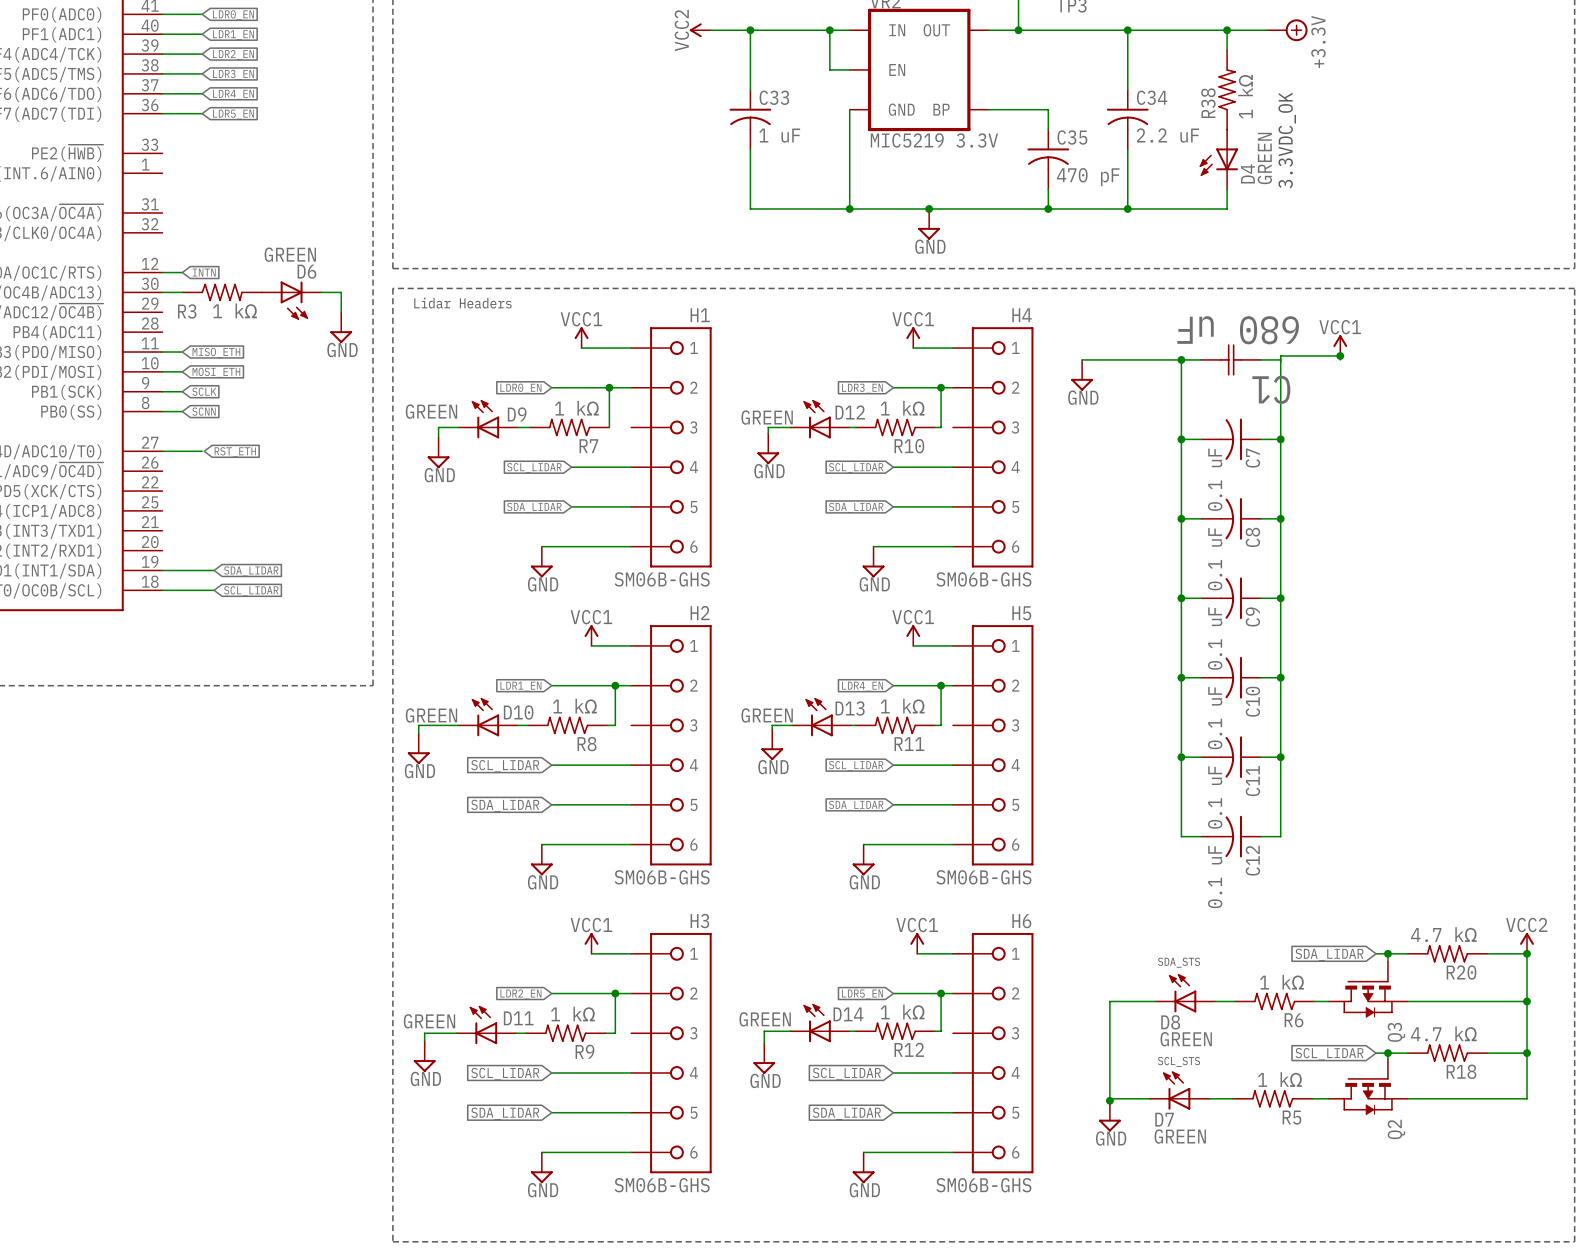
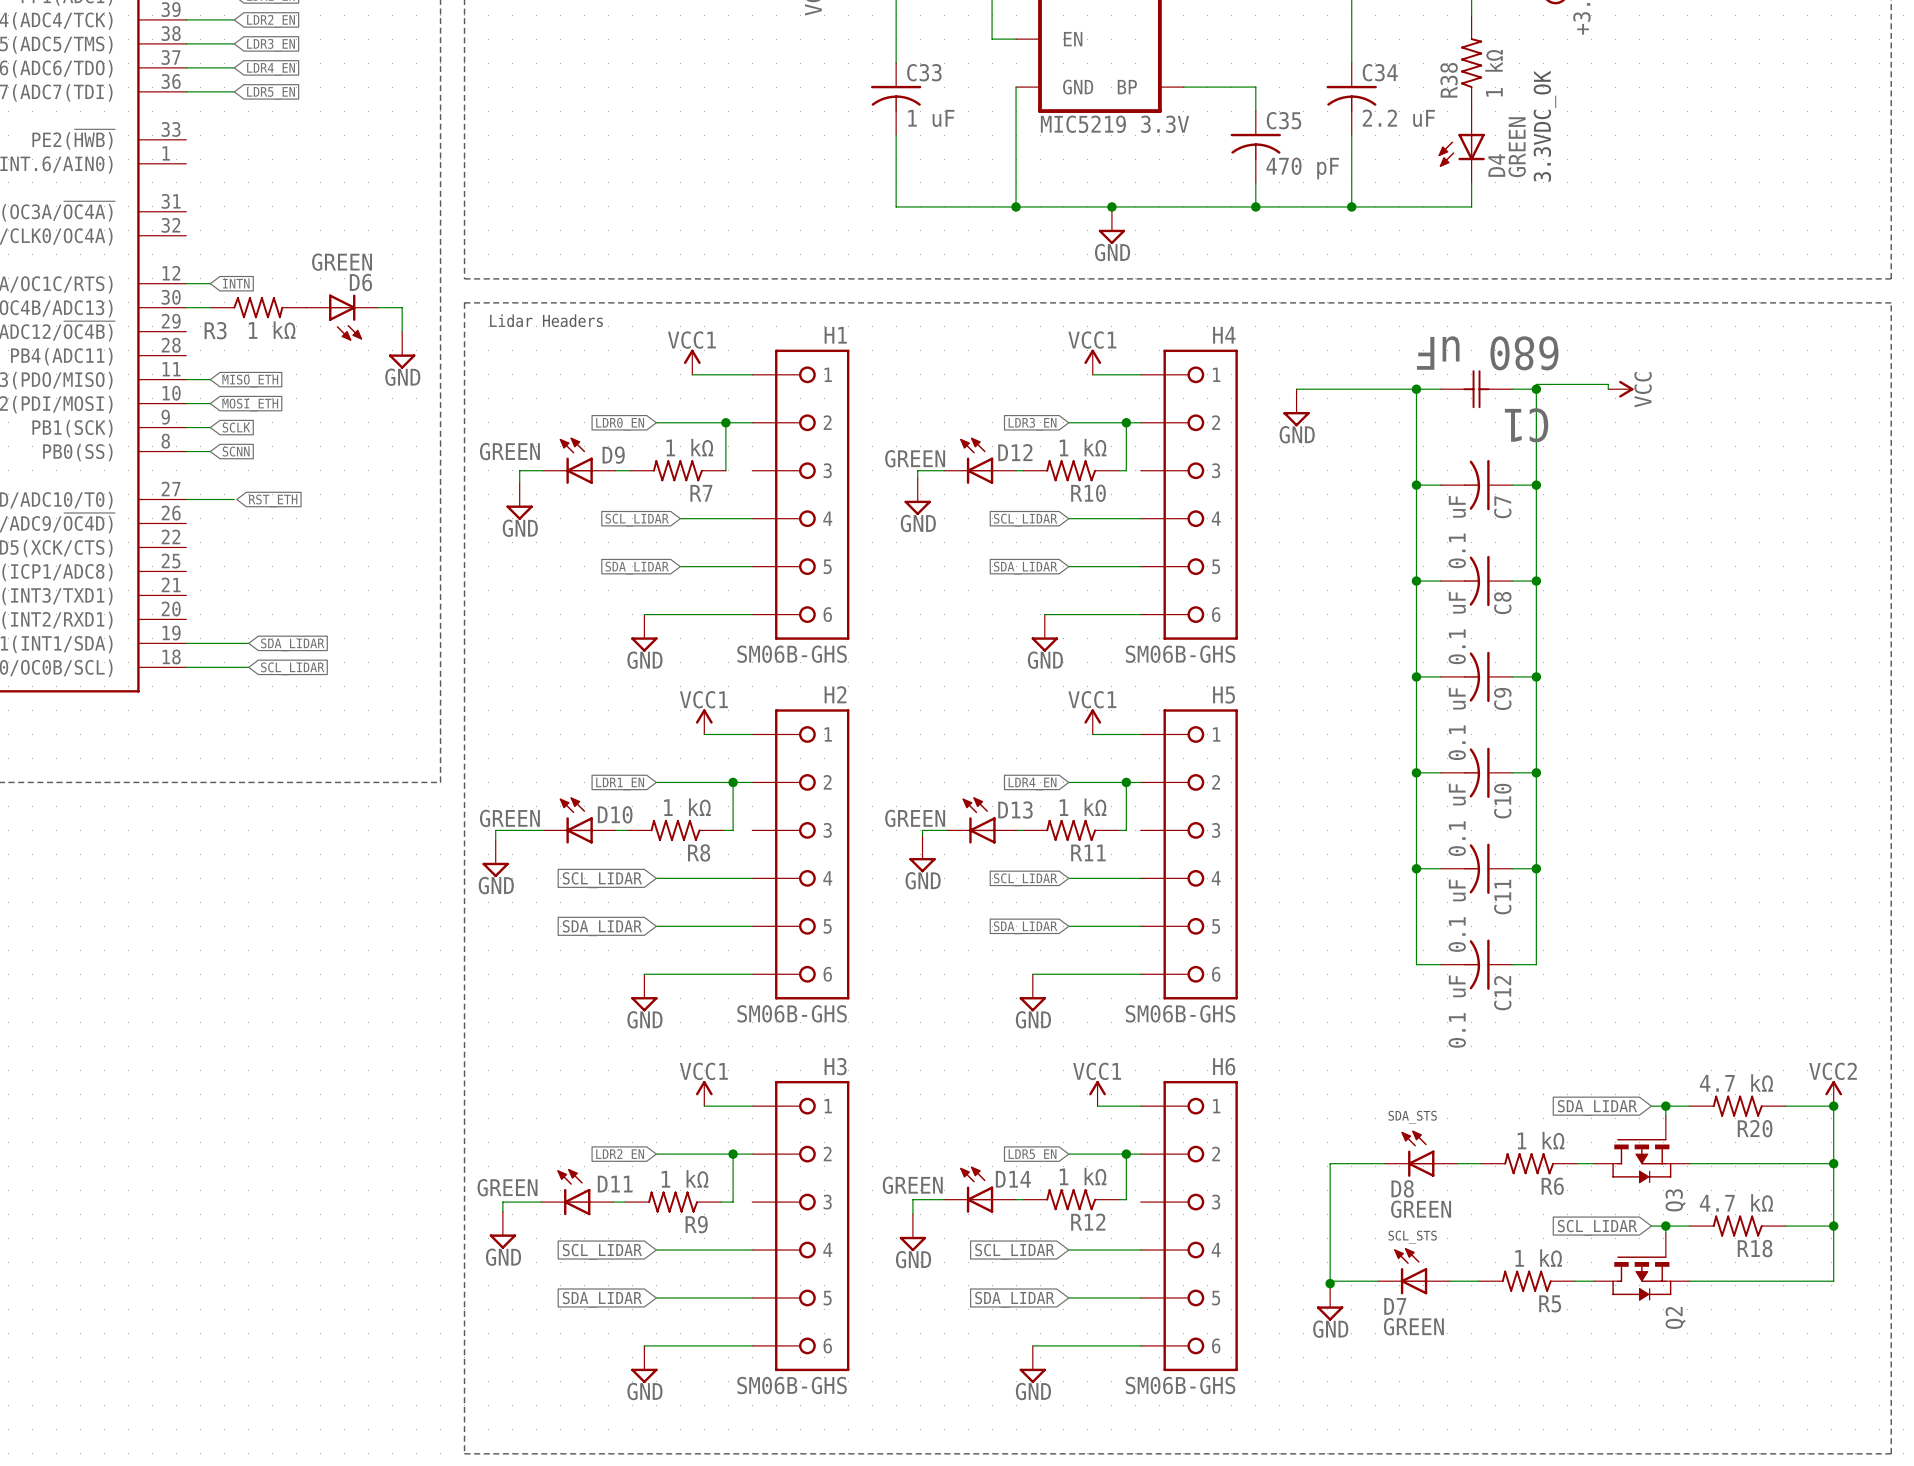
power symbol: VCC1 (1340, 345) -> none
junction: (1340, 355) -> none
junction: none -> (1536, 389)
power symbol: none -> VCC (1620, 389)

